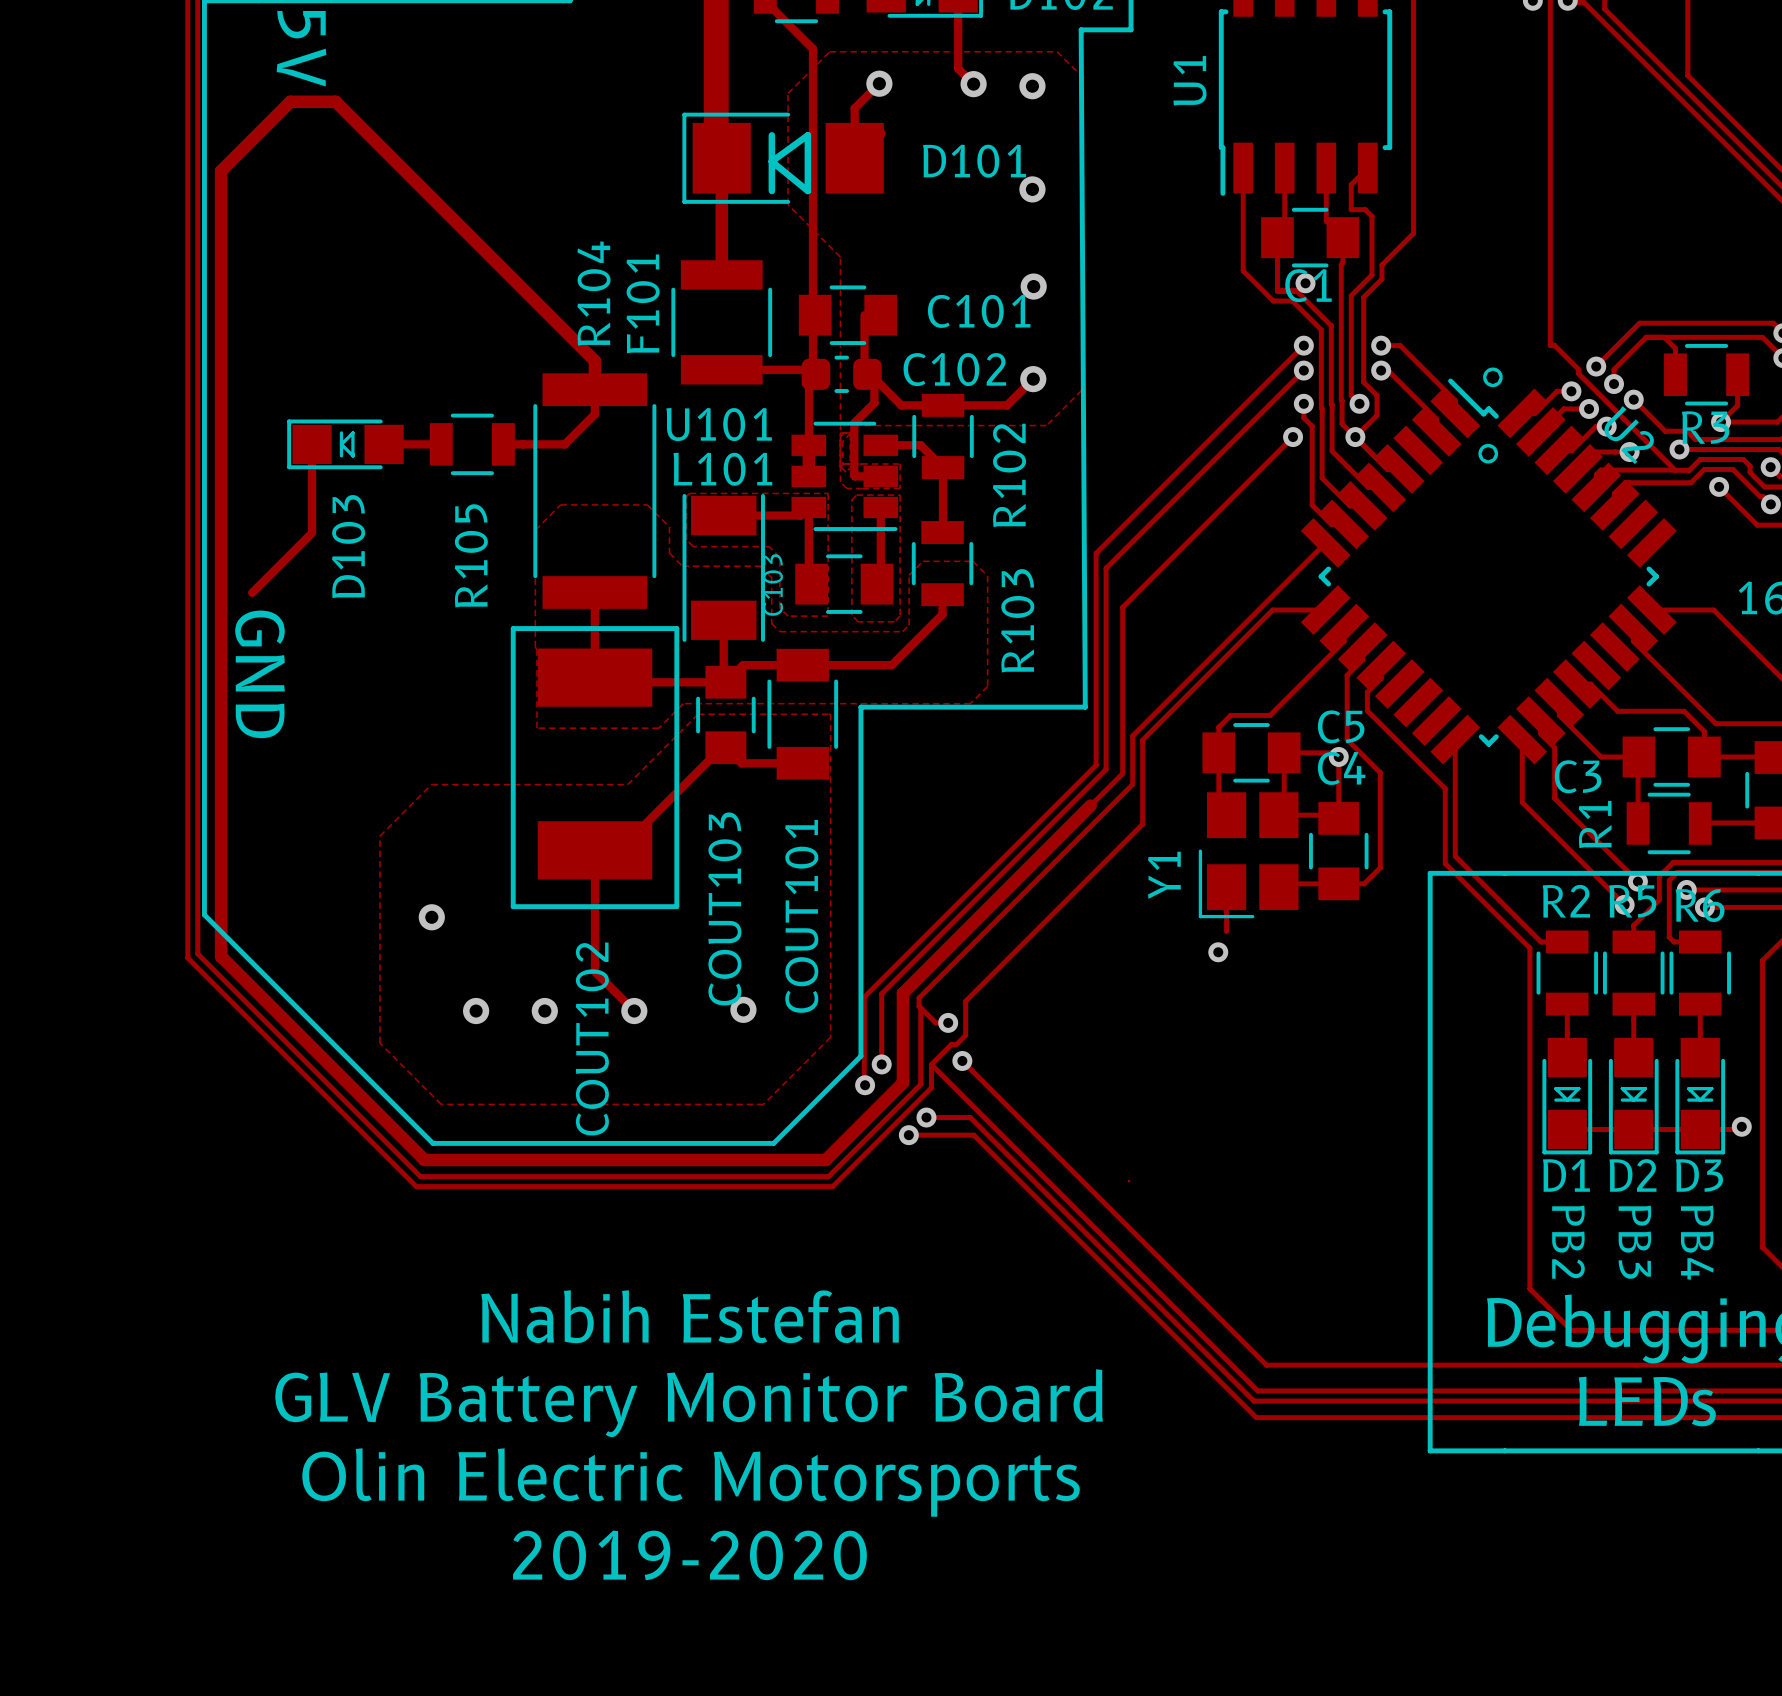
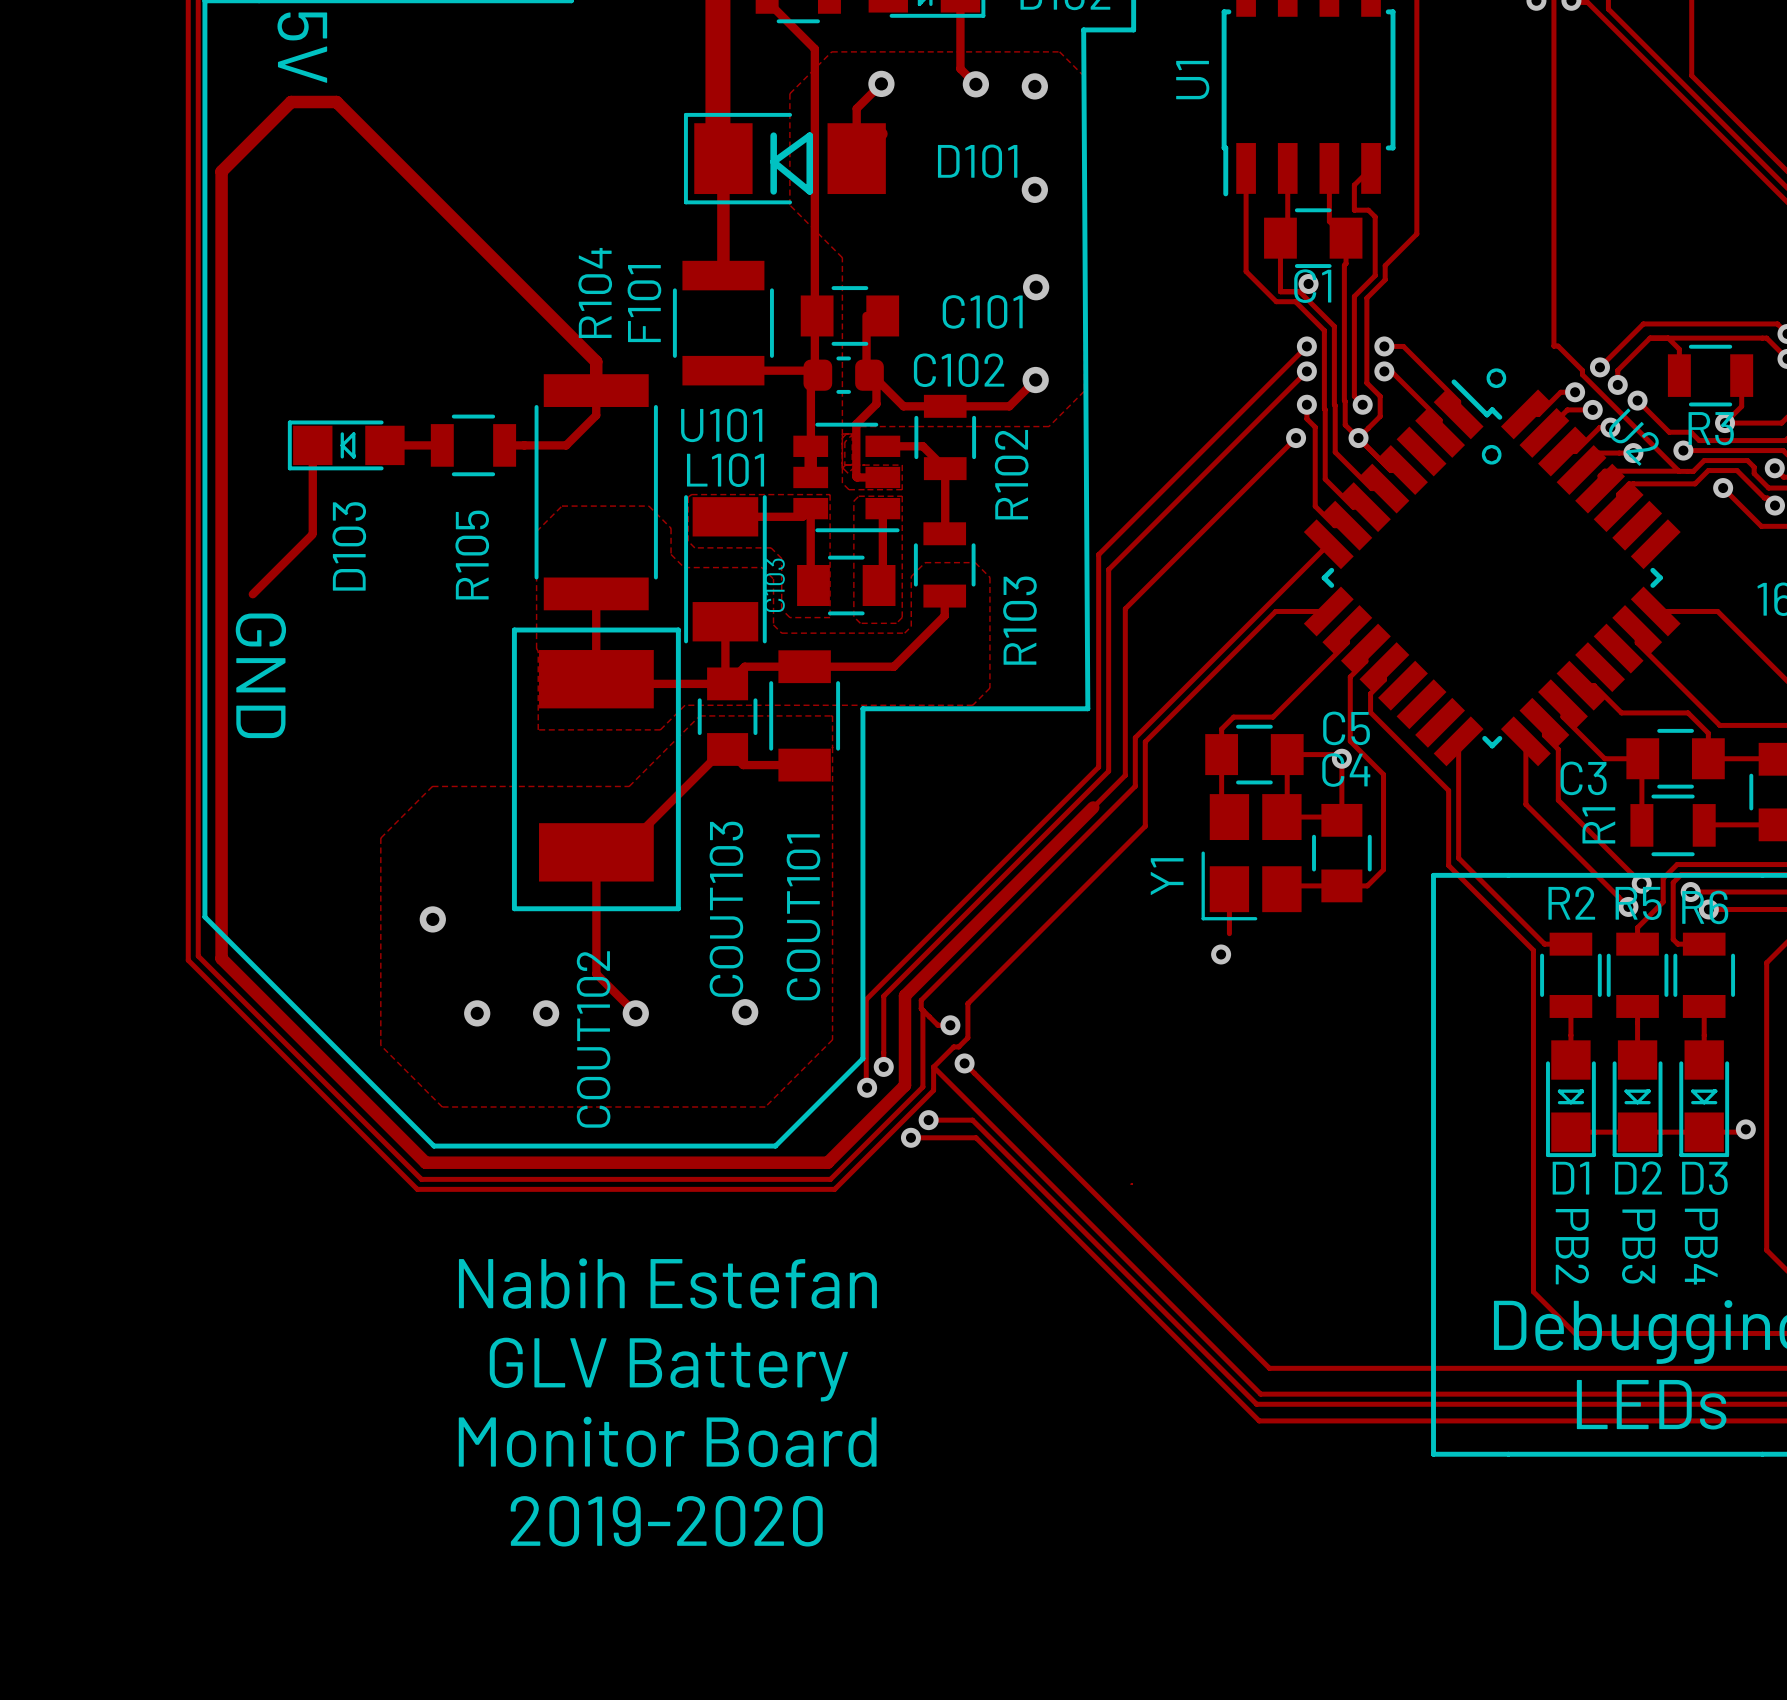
text position: Nabih Estefan (690, 1316) -> Nabih Estefan (667, 1283)
text: none -> GLV Battery (668, 1369)
text: GLV Battery Monitor Board (689, 1403) -> none
text: none -> Monitor Board (667, 1441)
text: Olin Electric Motorsports (691, 1482) -> none
text position: 2019-2020 (689, 1555) -> 2019-2020 (666, 1521)

